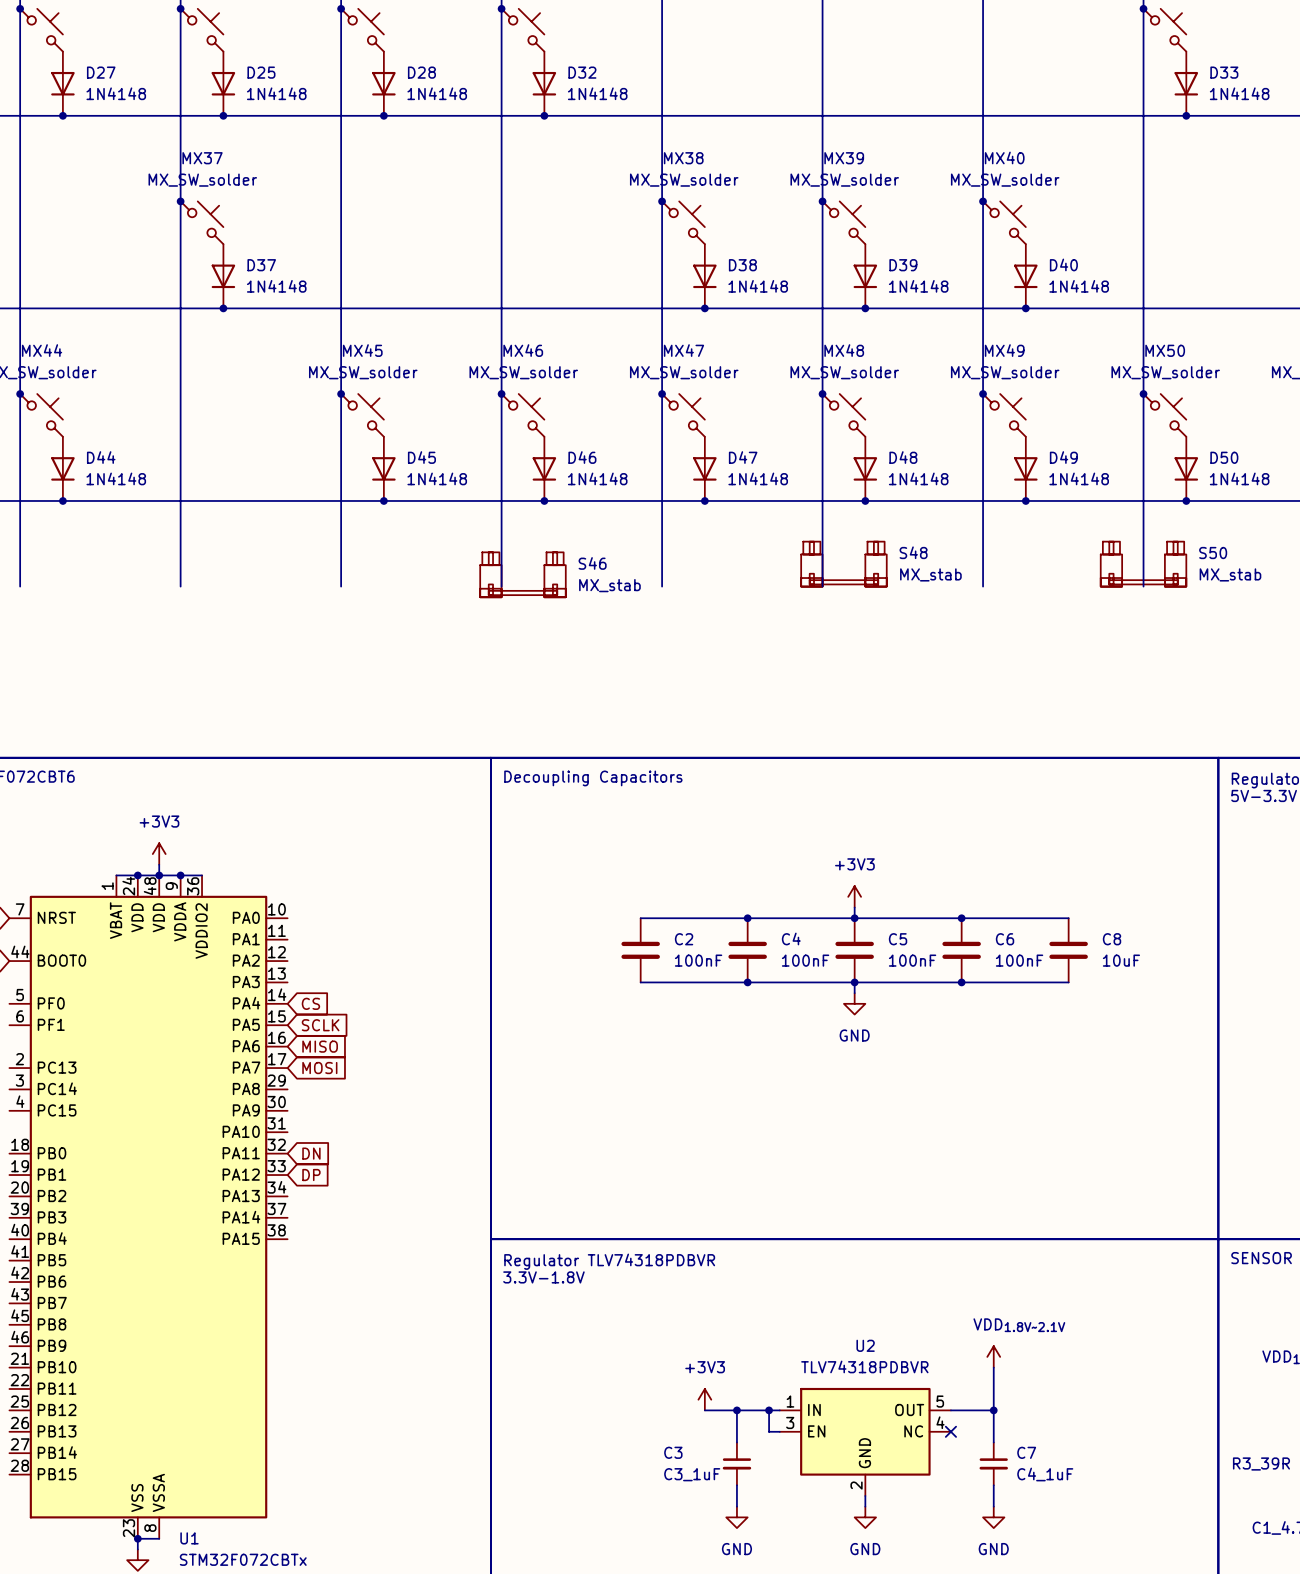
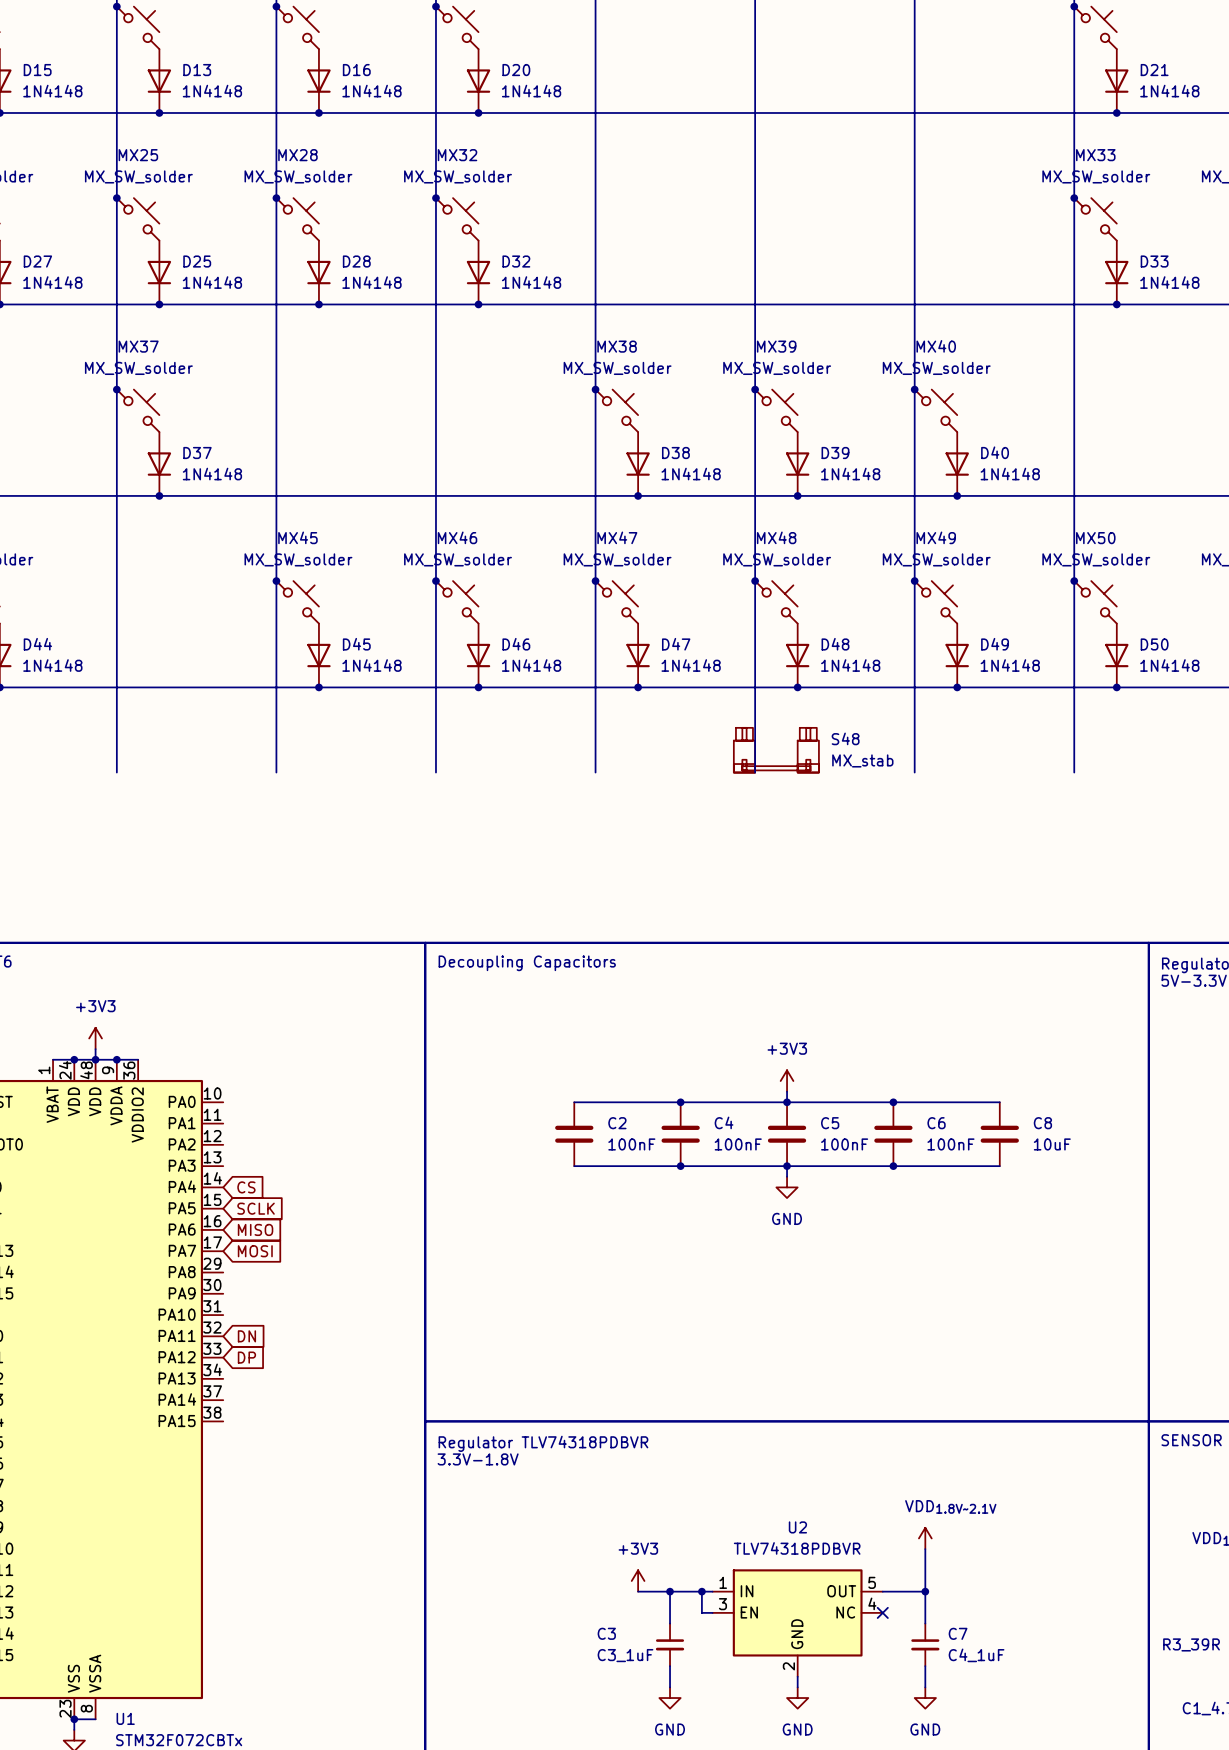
S50: MX_stab (1143, 564) -> none
S46: MX_stab (522, 574) -> none

